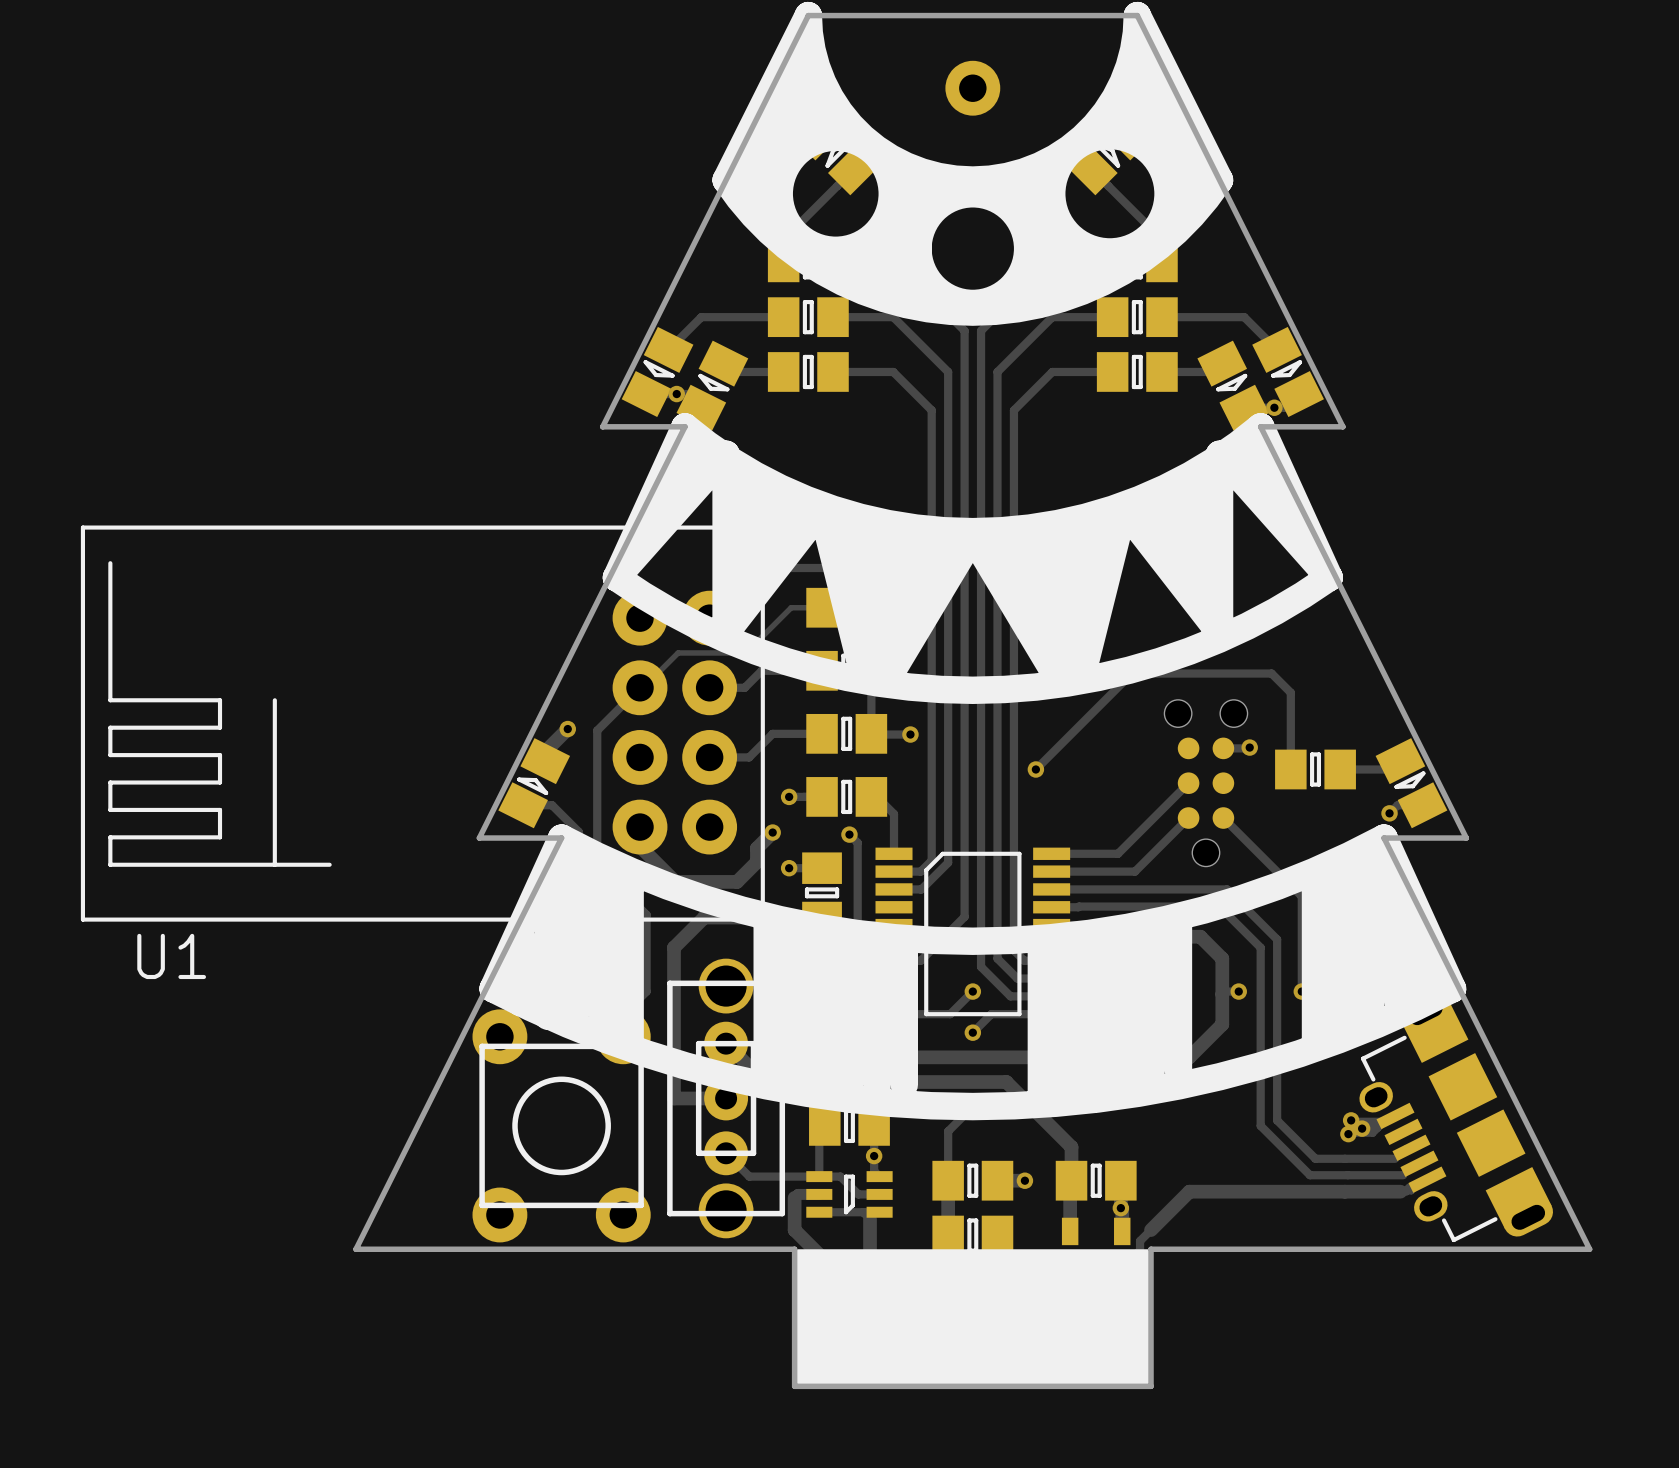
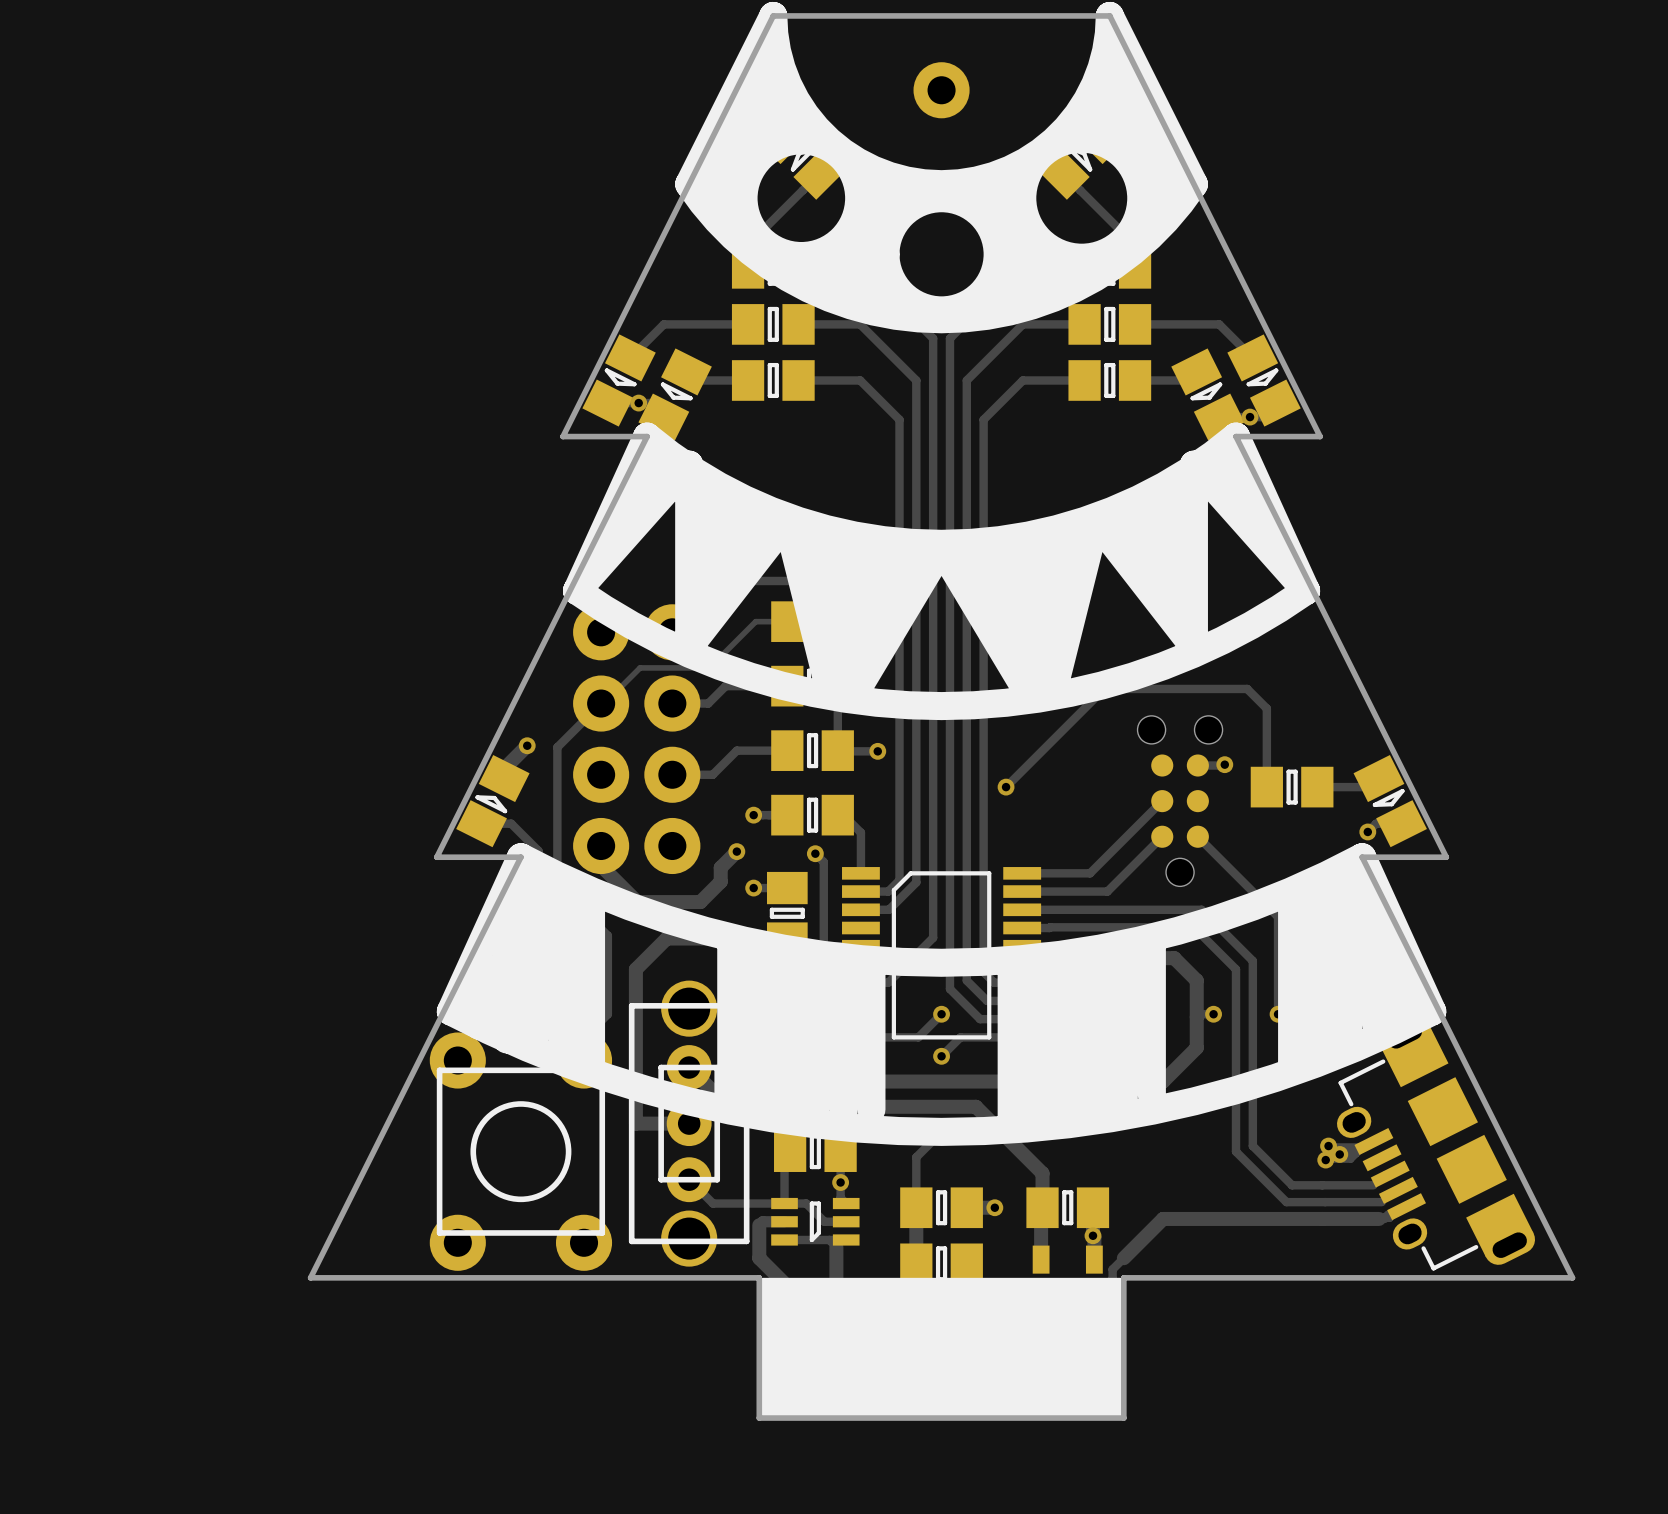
U1: (422, 723) -> none

